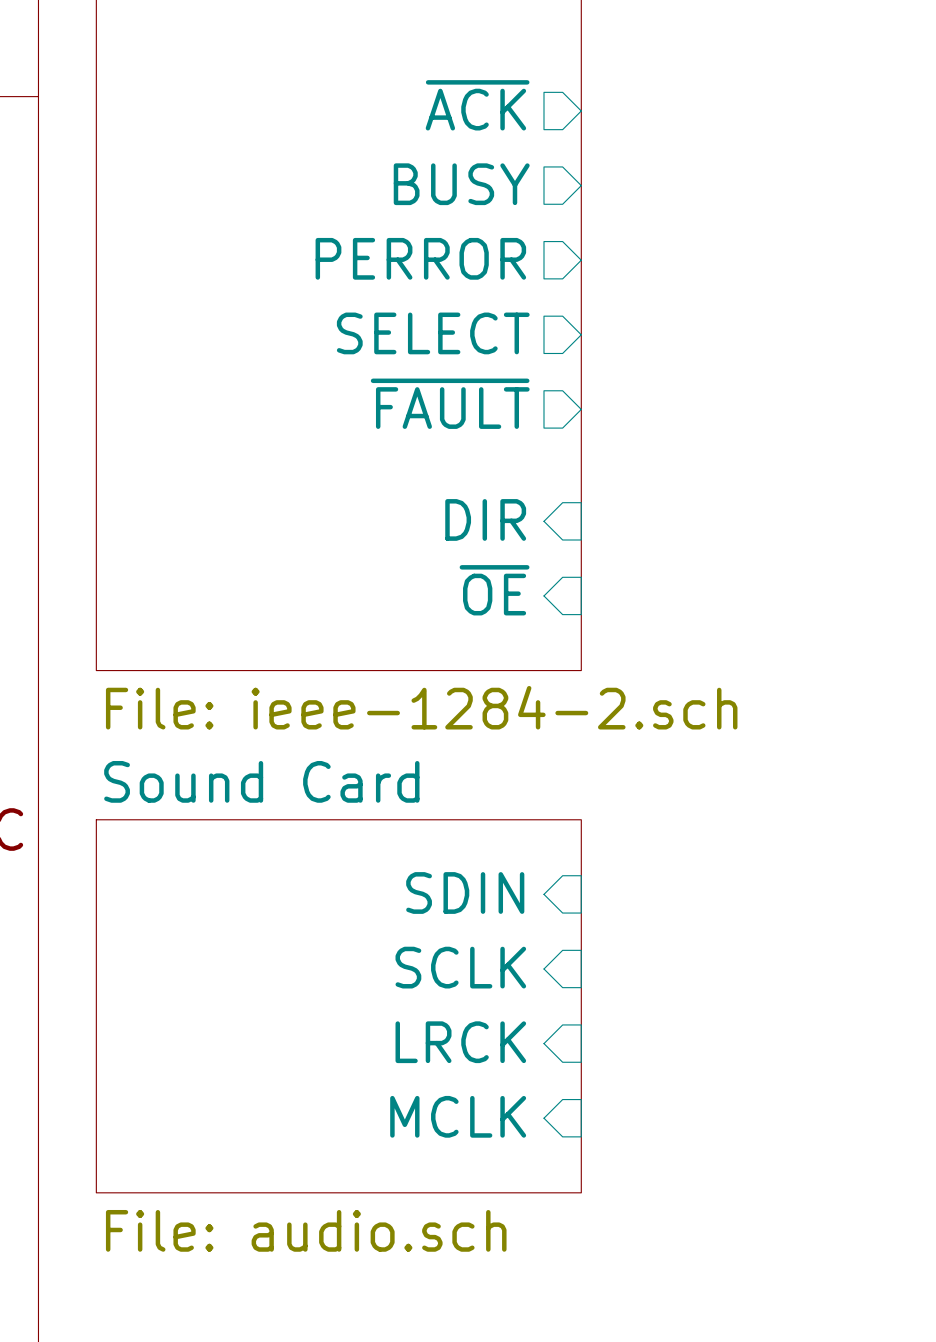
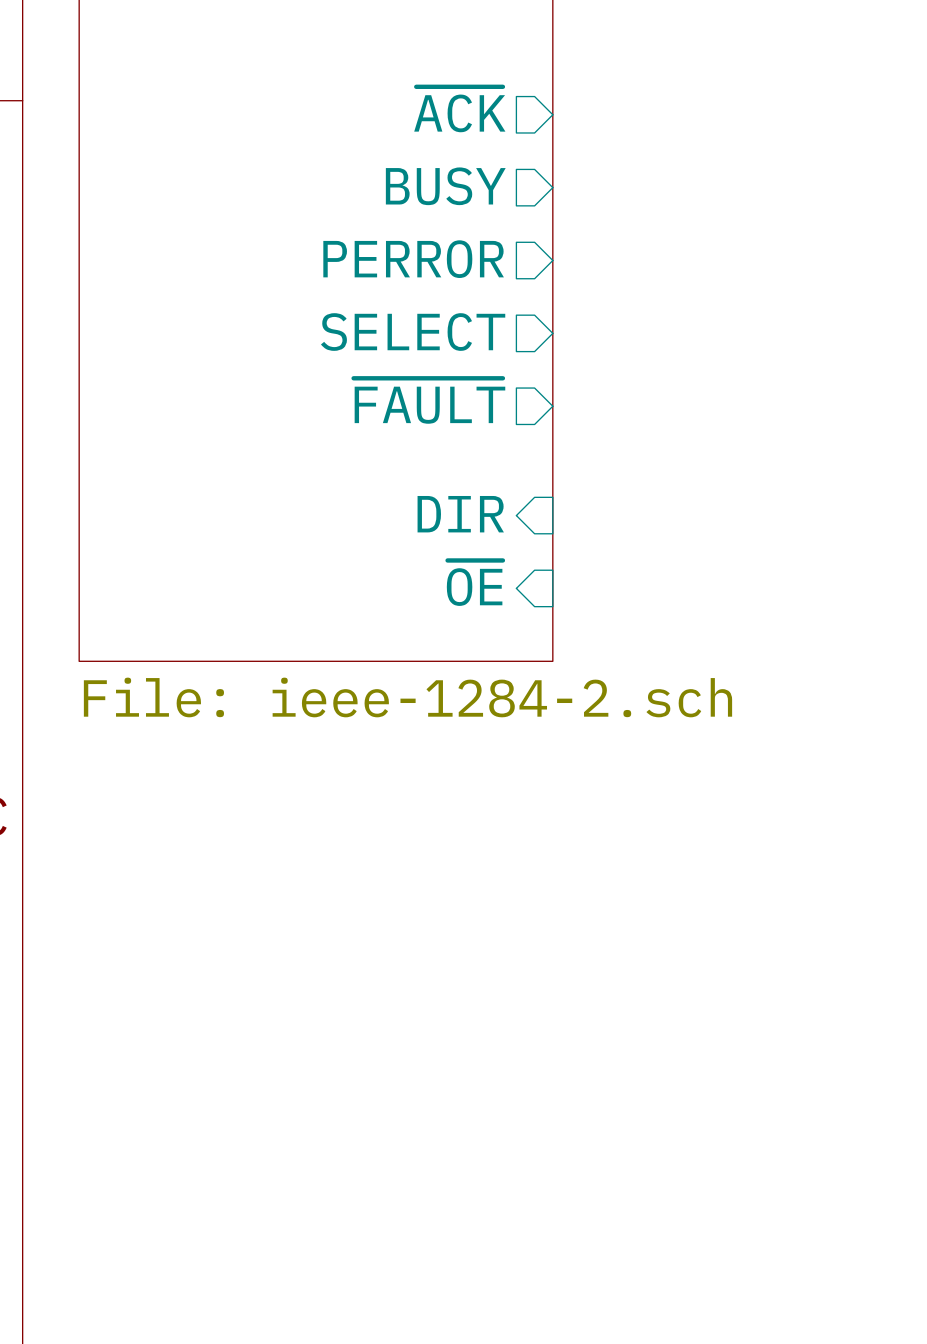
sheet pin: SDIN (465, 892) -> none
sheet pin: SCLK (460, 967) -> none
sheet Sound Card: File: audio.sch (338, 1006) -> none
sheet pin: LRCK (460, 1042) -> none
sheet pin: MCLK (458, 1116) -> none

